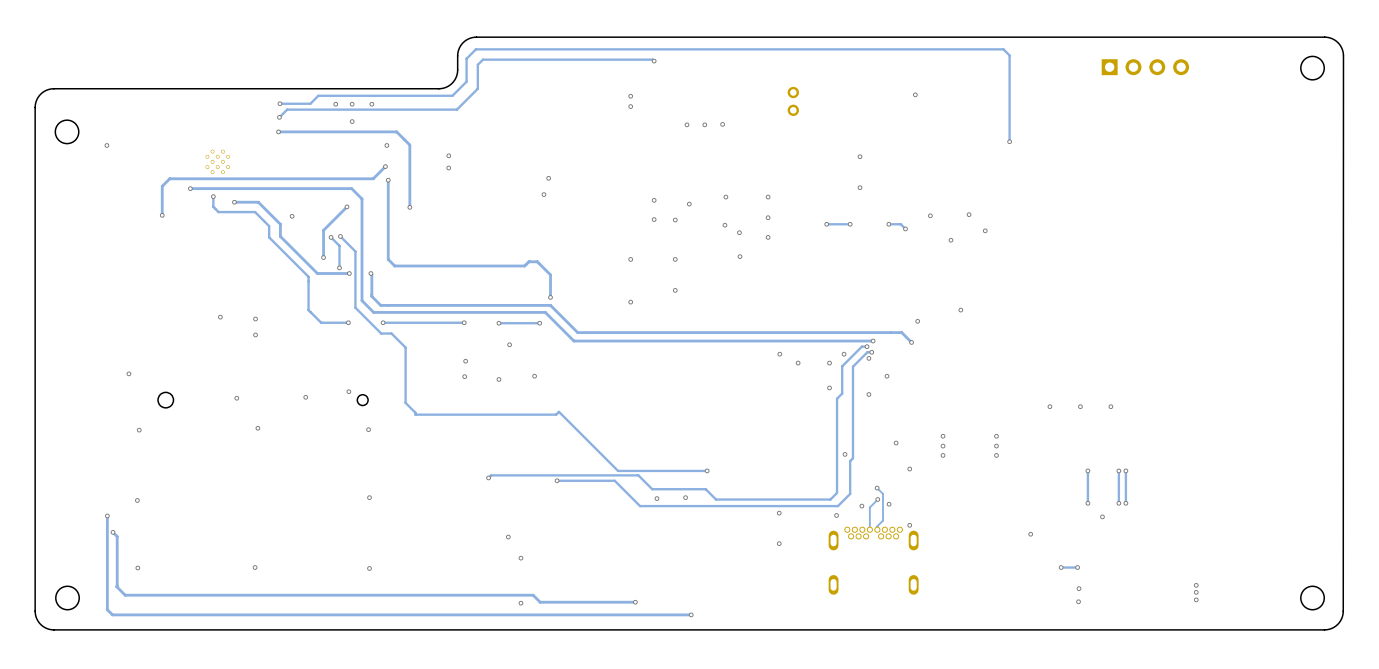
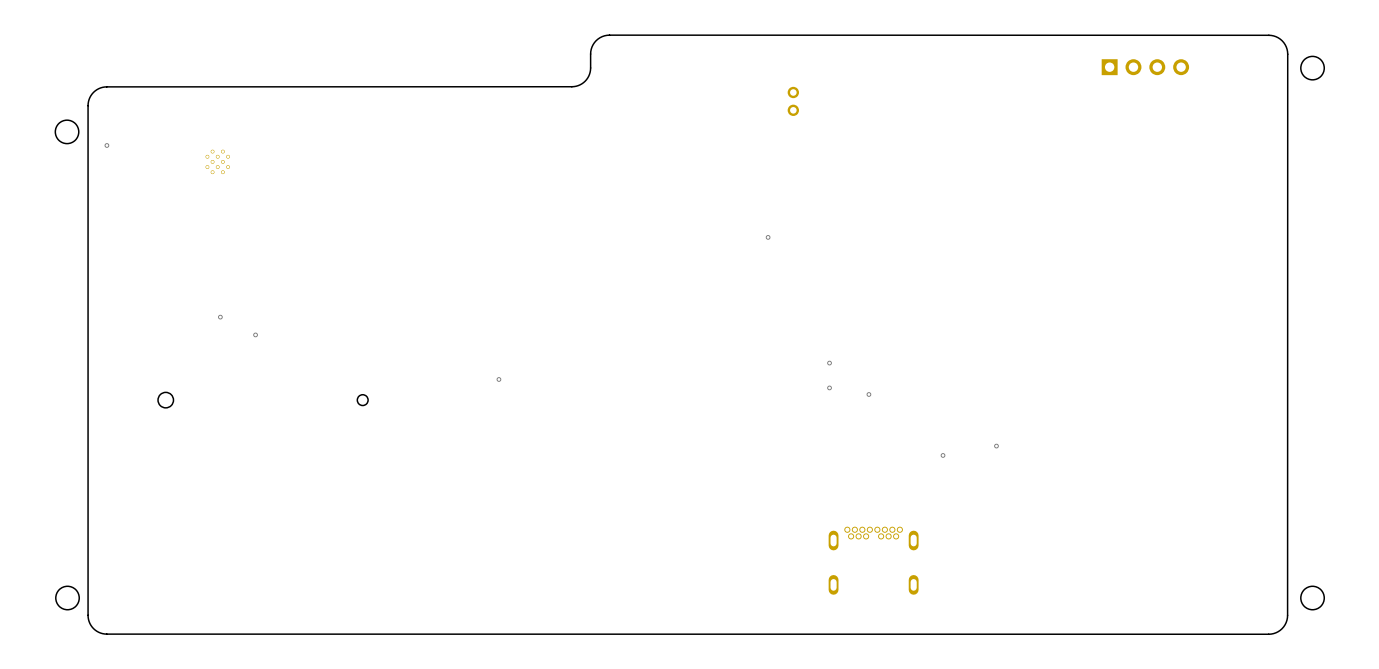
board edge: none -> (1268, 35) (609, 35) (602, 36) (594, 42) (590, 51) (588, 76) (583, 82) (573, 86) (106, 86) (98, 88) (90, 95) (88, 105) (88, 615) (93, 628) (106, 634) (1268, 634) (1282, 628) (1287, 615)
board edge: none -> (1268, 35) (1282, 40) (1287, 54) (1287, 615)
board edge: (1324, 37) (476, 37) (466, 40) (460, 45) (457, 53) (455, 78) (450, 84) (441, 88) (53, 88) (45, 90) (38, 97) (35, 107) (35, 611) (37, 619) (43, 627) (53, 629) (1331, 628) (1339, 622) (1343, 611) (1343, 55) (1337, 42) (1324, 37) -> none
track: (654, 61) (482, 59) (477, 64) (477, 88) (456, 109) (287, 109) (279, 117) -> none
via: (654, 61) -> none
via: (915, 94) -> none
via: (630, 96) -> none
track: (279, 103) (310, 103) (318, 95) (452, 95) (466, 81) (466, 58) (475, 49) (1003, 49) (1009, 55) (1009, 141) -> none
via: (279, 103) -> none
via: (335, 104) -> none
via: (352, 104) -> none
via: (371, 104) -> none
via: (630, 106) -> none
via: (279, 117) -> none
via: (352, 121) -> none
via: (686, 124) -> none
via: (704, 124) -> none
via: (722, 124) -> none
track: (278, 131) (396, 131) (409, 145) (409, 207) -> none
via: (278, 131) -> none
via: (1009, 141) -> none
via: (386, 145) -> none
via: (448, 155) -> none
via: (860, 156) -> none
track: (385, 166) (373, 178) (169, 178) (162, 186) (162, 215) -> none
via: (385, 166) -> none
via: (448, 168) -> none
via: (548, 178) -> none
track: (388, 180) (388, 259) (394, 266) (524, 266) (528, 261) (537, 261) (550, 274) (550, 297) -> none
via: (388, 180) -> none
via: (860, 187) -> none
track: (190, 188) (351, 188) (362, 198) (362, 300) (373, 312) (545, 312) (573, 341) (873, 341) -> none
via: (190, 188) -> none
via: (543, 194) -> none
track: (213, 196) (213, 206) (218, 212) (255, 212) (269, 226) (269, 237) (308, 276) (308, 310) (321, 322) (348, 322) -> none
via: (213, 196) -> none
via: (725, 197) -> none
via: (768, 197) -> none
via: (654, 200) -> none
track: (234, 202) (258, 202) (280, 224) (280, 236) (317, 273) (349, 273) -> none
via: (234, 202) -> none
via: (689, 204) -> none
track: (347, 206) (323, 230) (323, 257) -> none
via: (347, 206) -> none
via: (409, 207) -> none
via: (969, 214) -> none
via: (162, 215) -> none
via: (930, 215) -> none
via: (292, 216) -> none
via: (768, 217) -> none
via: (654, 219) -> none
via: (675, 220) -> none
via: (826, 224) -> none
track: (850, 224) (826, 224) -> none
via: (850, 224) -> none
track: (888, 224) (900, 224) (905, 228) -> none
via: (888, 224) -> none
via: (724, 225) -> none
via: (905, 228) -> none
via: (985, 230) -> none
via: (739, 232) -> none
track: (340, 236) (355, 251) (355, 307) (381, 333) (391, 333) (405, 347) (405, 402) (415, 414) (556, 414) (558, 411) (618, 470) (707, 470) -> none
via: (340, 236) -> none
track: (331, 237) (339, 245) (339, 267) -> none
via: (331, 237) -> none
via: (950, 240) -> none
via: (739, 256) -> none
via: (323, 257) -> none
via: (630, 259) -> none
via: (675, 259) -> none
via: (339, 267) -> none
via: (349, 273) -> none
track: (370, 273) (371, 296) (380, 305) (550, 305) (577, 332) (901, 332) (911, 342) -> none
via: (370, 273) -> none
via: (675, 290) -> none
via: (550, 297) -> none
via: (630, 302) -> none
via: (960, 310) -> none
via: (255, 318) -> none
via: (917, 321) -> none
via: (348, 322) -> none
via: (383, 322) -> none
track: (464, 322) (383, 322) -> none
via: (464, 322) -> none
via: (498, 323) -> none
track: (539, 323) (498, 323) -> none
via: (539, 323) -> none
via: (873, 341) -> none
via: (911, 342) -> none
via: (509, 344) -> none
track: (867, 346) (861, 346) (842, 366) (842, 393) (837, 398) (837, 492) (830, 499) (716, 499) (705, 489) (652, 489) (638, 475) (491, 475) (488, 477) -> none
via: (867, 346) -> none
track: (871, 352) (867, 352) (852, 366) (852, 458) (850, 461) (850, 493) (837, 506) (640, 506) (614, 480) (557, 480) -> none
via: (871, 352) -> none
via: (779, 354) -> none
via: (844, 354) -> none
via: (868, 358) -> none
via: (465, 361) -> none
via: (798, 363) -> none
via: (128, 373) -> none
via: (464, 376) -> none
via: (534, 376) -> none
via: (887, 376) -> none
via: (348, 391) -> none
via: (305, 397) -> none
via: (236, 398) -> none
via: (1049, 406) -> none
via: (1080, 406) -> none
via: (1110, 406) -> none
via: (257, 428) -> none
via: (368, 429) -> none
via: (139, 430) -> none
via: (943, 436) -> none
via: (996, 436) -> none
via: (896, 443) -> none
via: (943, 446) -> none
via: (845, 454) -> none
via: (996, 455) -> none
via: (909, 469) -> none
via: (707, 470) -> none
track: (1087, 470) (1087, 503) -> none
via: (1087, 470) -> none
track: (1118, 470) (1118, 503) -> none
via: (1118, 470) -> none
track: (1125, 470) (1125, 503) -> none
via: (1125, 470) -> none
via: (488, 477) -> none
via: (557, 480) -> none
track: (877, 488) (882, 493) (882, 520) (877, 526) (877, 529) -> none
via: (877, 488) -> none
via: (369, 497) -> none
via: (685, 497) -> none
via: (656, 498) -> none
track: (877, 499) (869, 507) (869, 529) -> none
via: (877, 499) -> none
via: (137, 500) -> none
via: (1087, 503) -> none
via: (1118, 503) -> none
via: (1125, 503) -> none
via: (889, 504) -> none
via: (861, 506) -> none
via: (779, 513) -> none
track: (107, 515) (107, 609) (112, 614) (691, 614) -> none
via: (107, 515) -> none
via: (836, 515) -> none
via: (1102, 516) -> none
via: (909, 525) -> none
track: (113, 532) (117, 536) (116, 586) (125, 595) (533, 595) (540, 602) (635, 602) -> none
via: (113, 532) -> none
via: (1030, 534) -> none
via: (508, 537) -> none
via: (779, 543) -> none
via: (520, 558) -> none
via: (255, 567) -> none
via: (1061, 567) -> none
track: (1077, 567) (1061, 567) -> none
via: (1077, 567) -> none
via: (137, 568) -> none
via: (369, 568) -> none
via: (1196, 585) -> none
via: (1079, 588) -> none
via: (1196, 592) -> none
via: (1196, 599) -> none
via: (1078, 601) -> none
via: (635, 602) -> none
via: (520, 603) -> none
via: (691, 614) -> none

